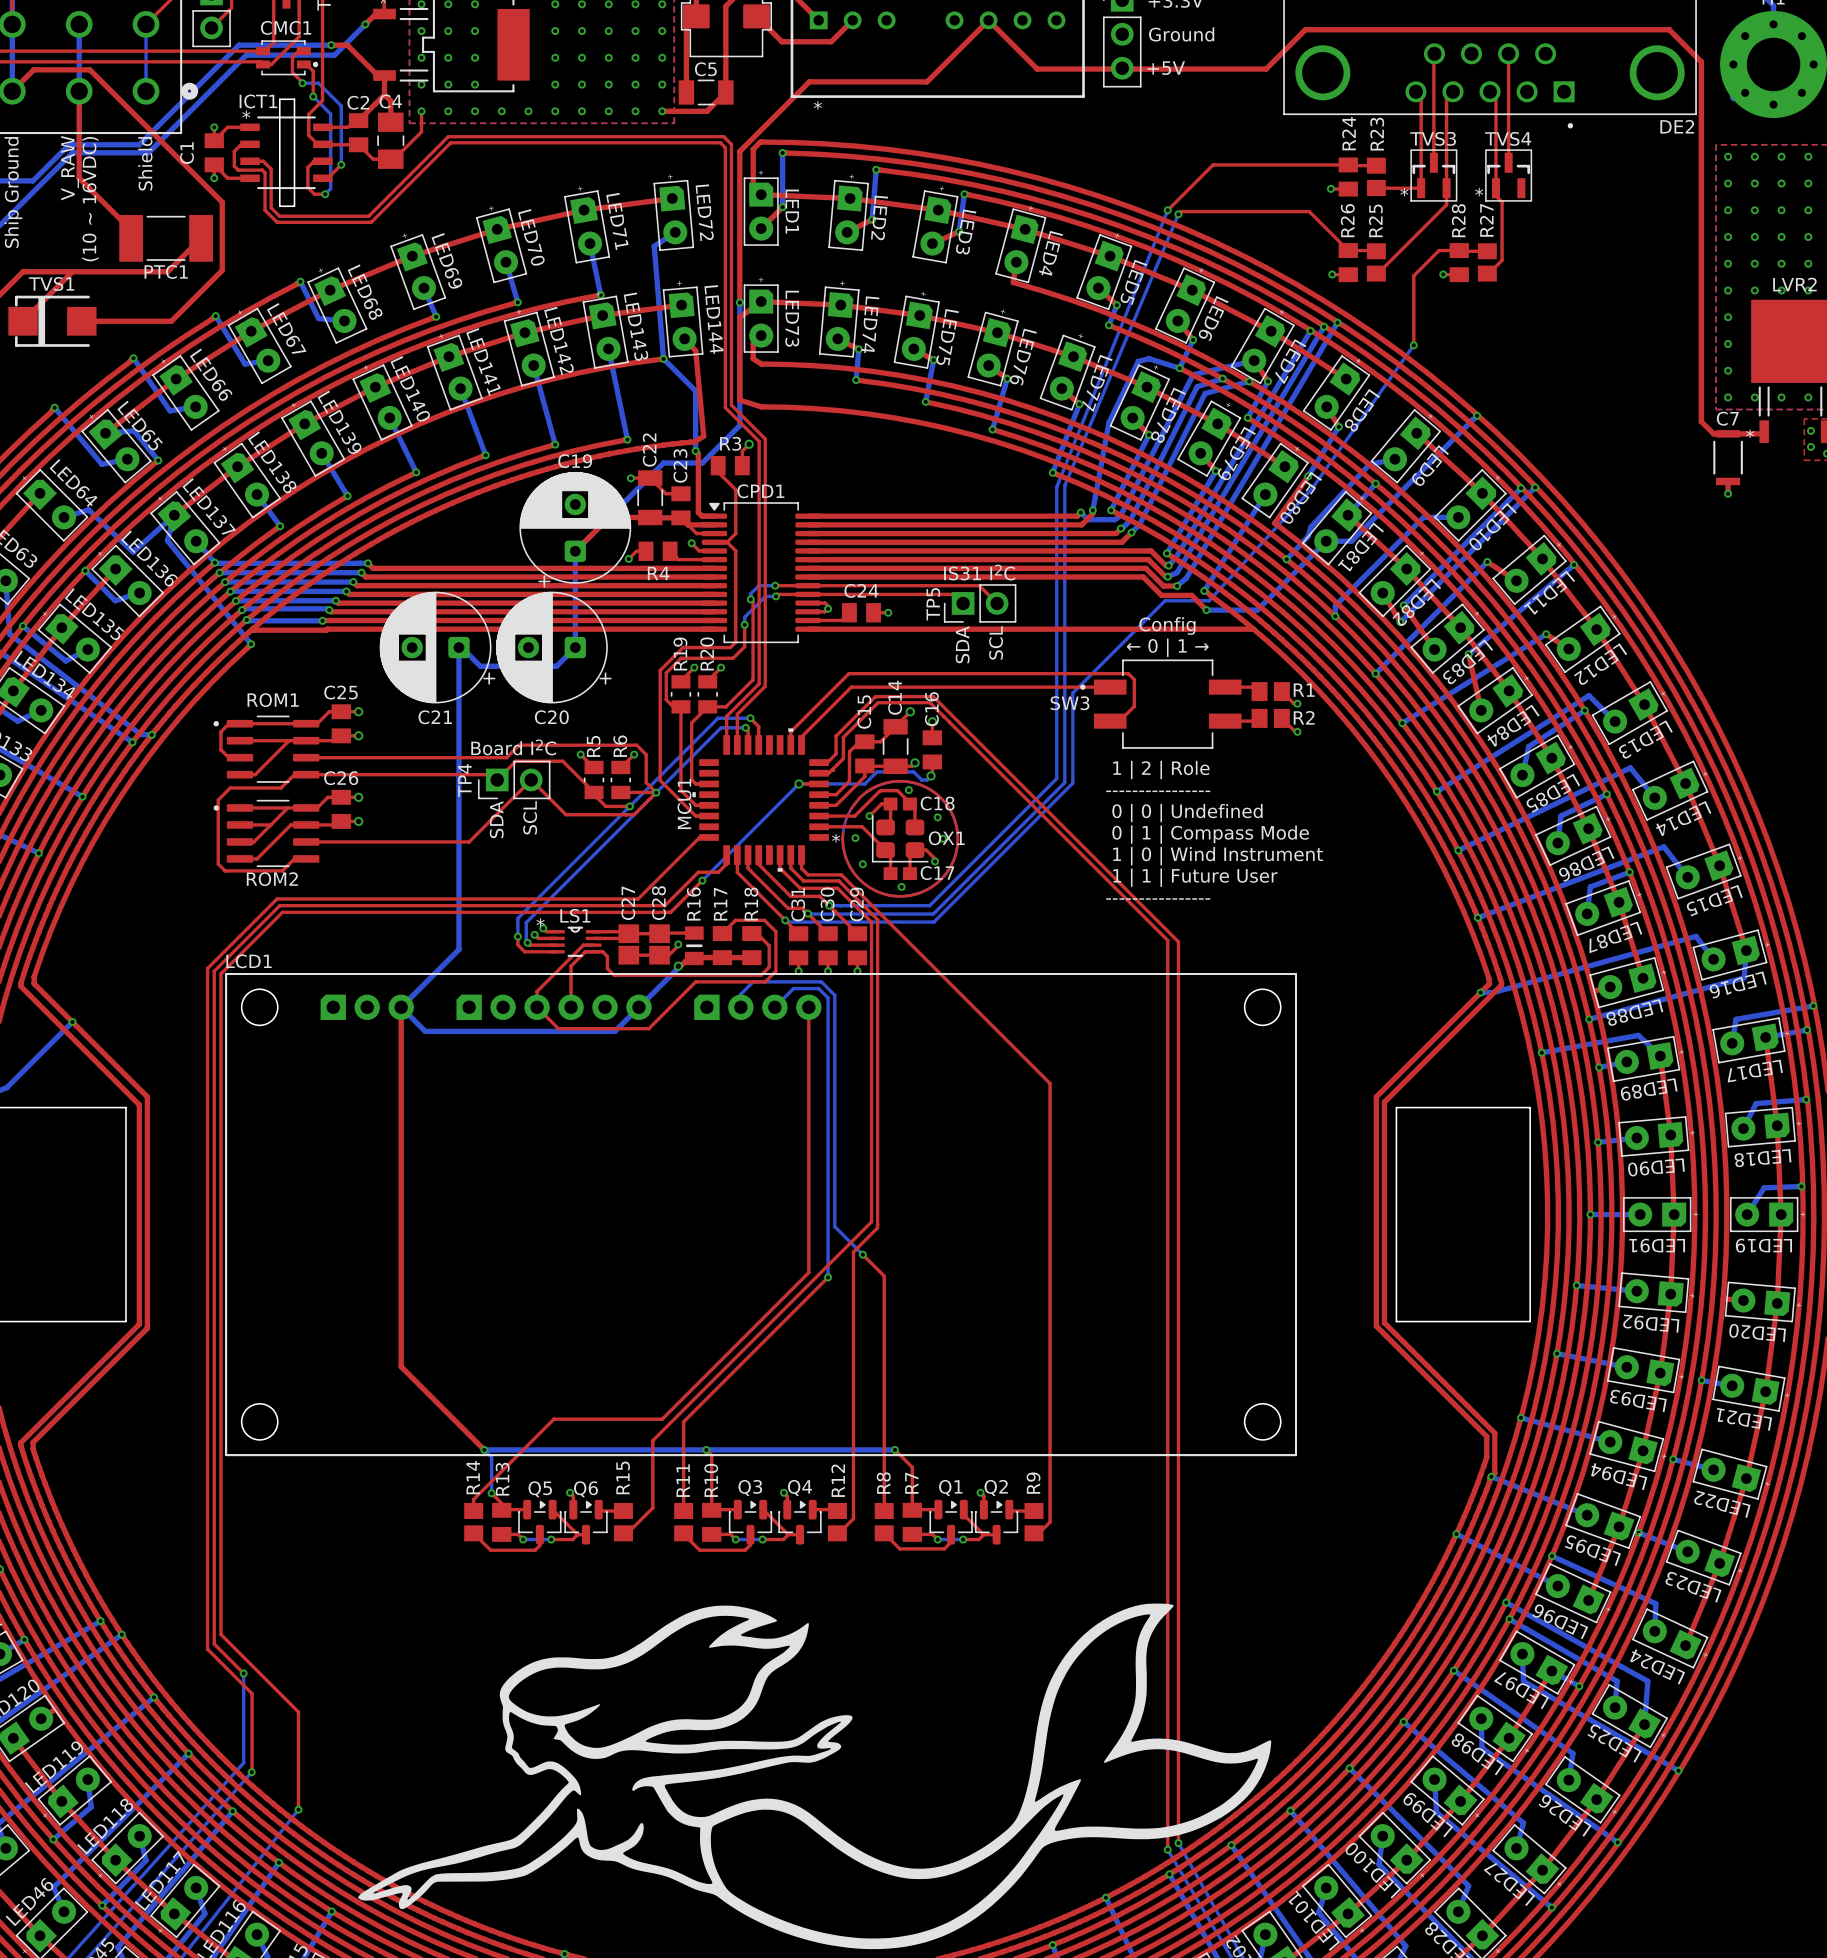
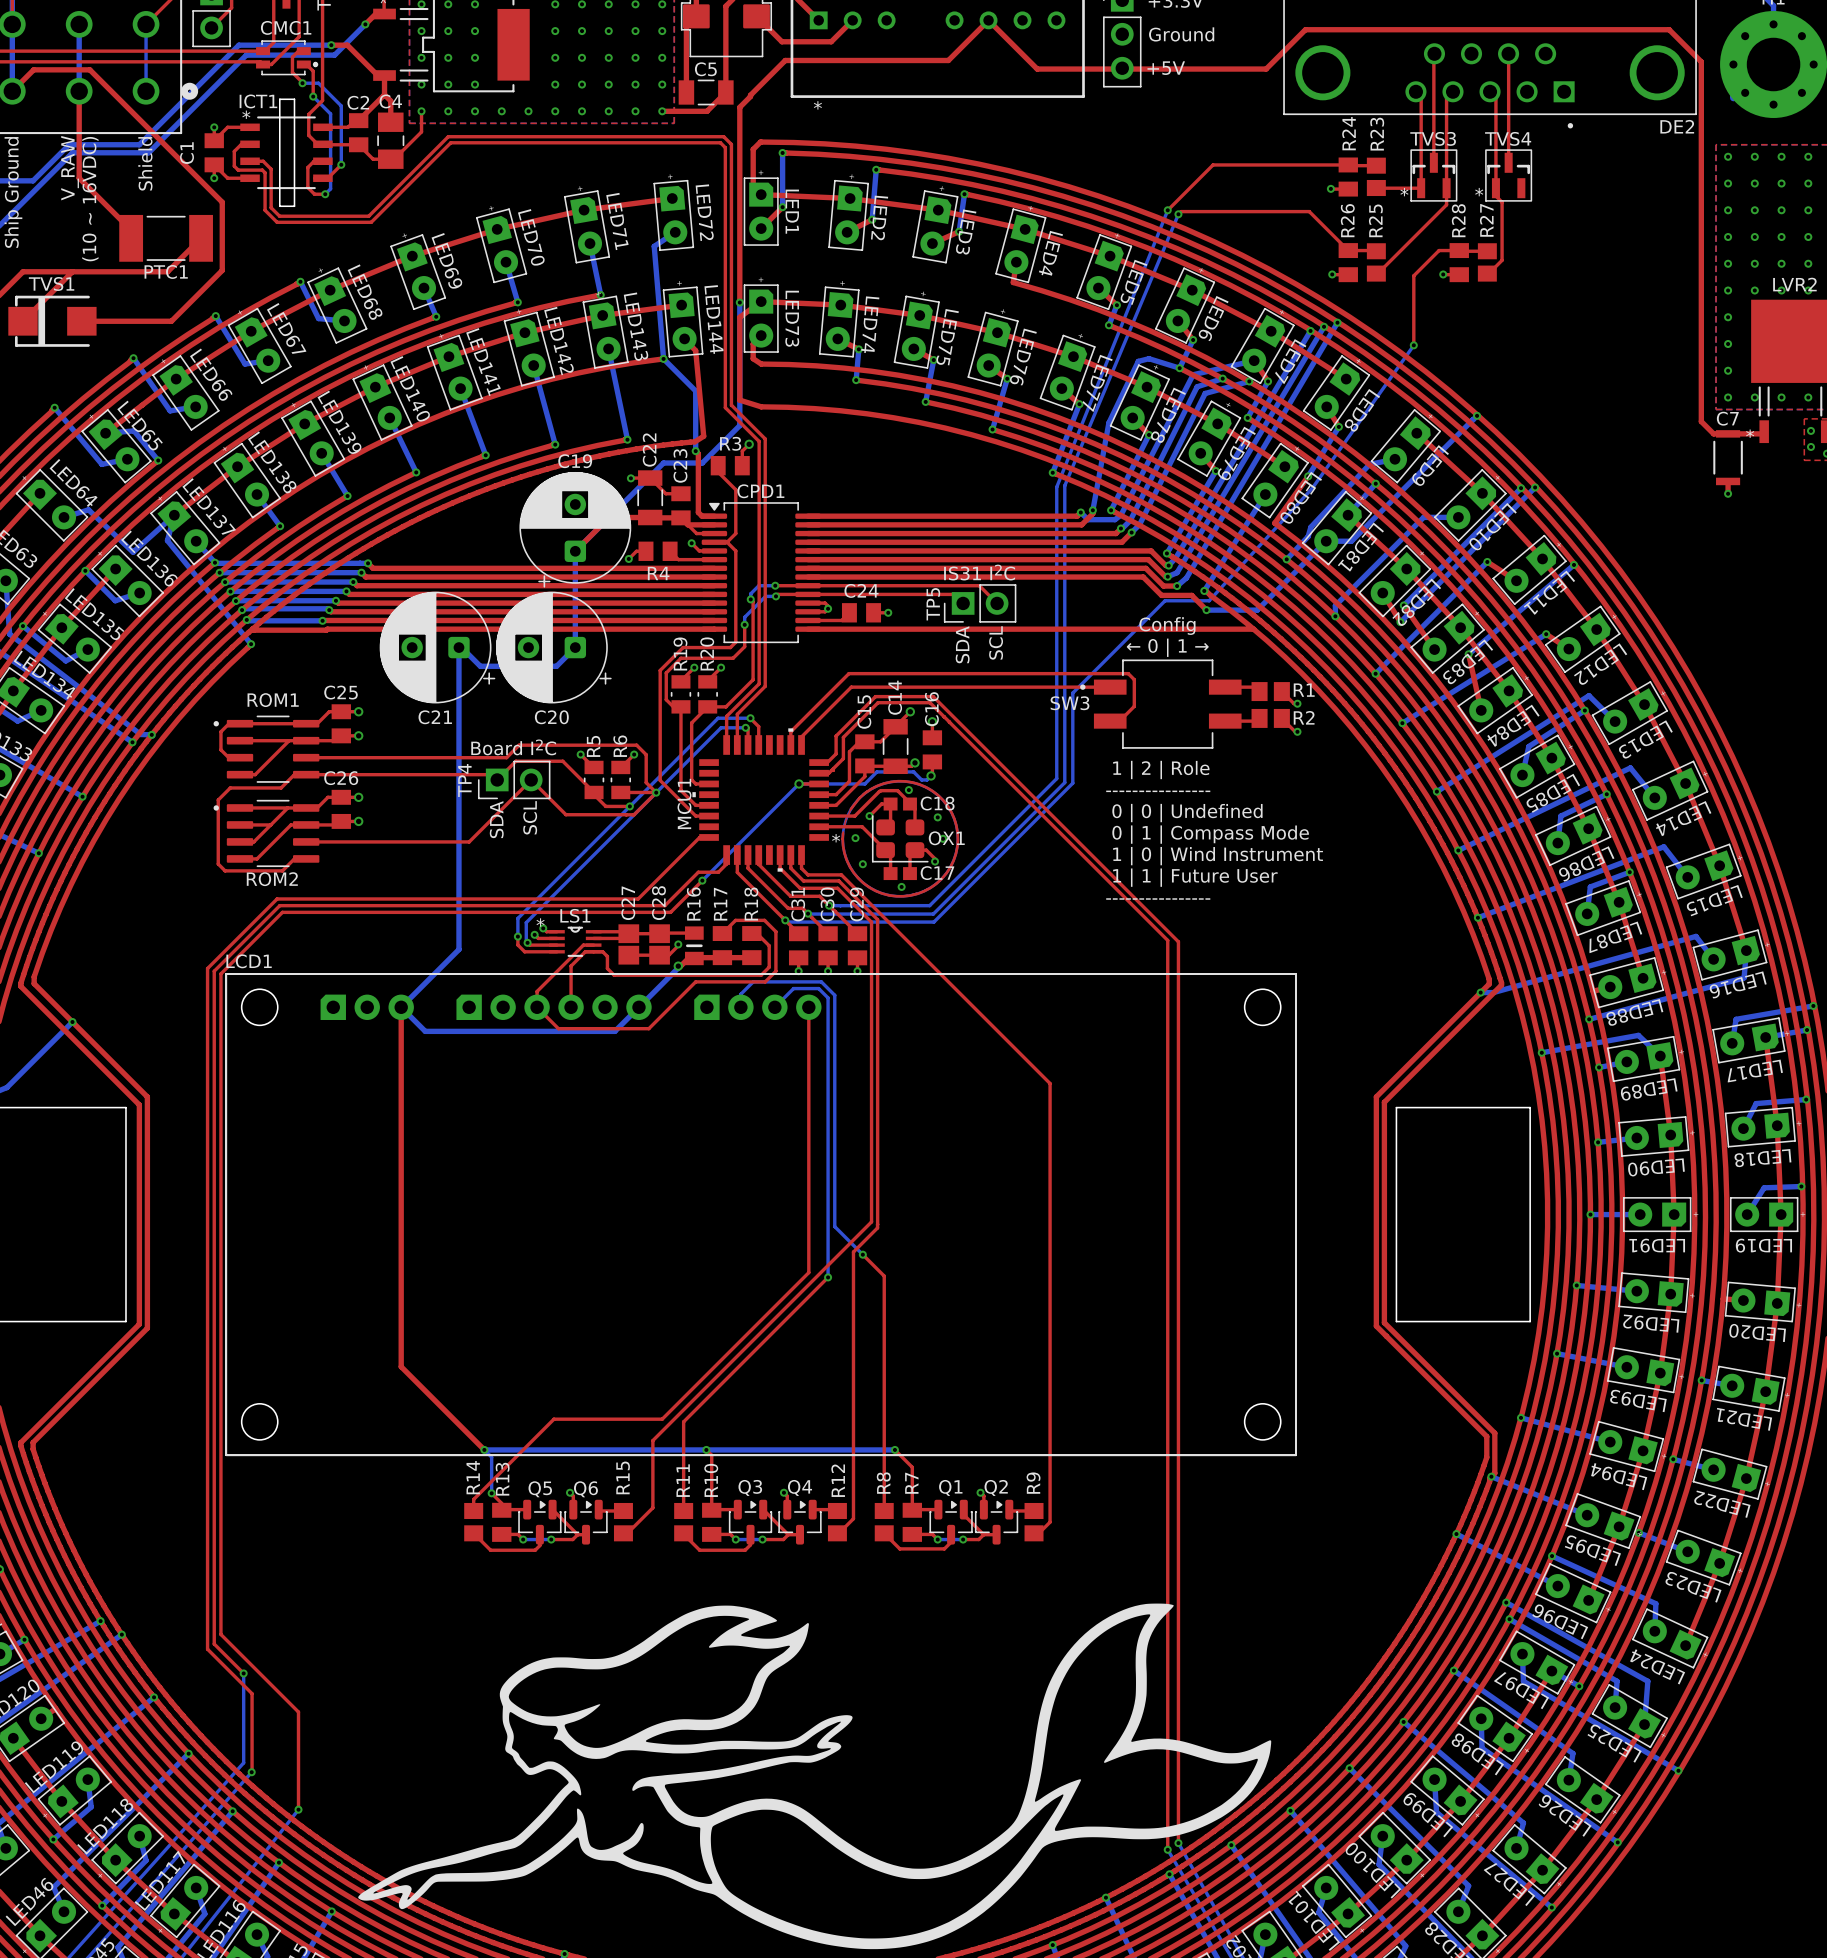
top track: (948, 60) (927, 81) (809, 81) (739, 151) -> (948, 60) (785, 60) (739, 107) (739, 151)

